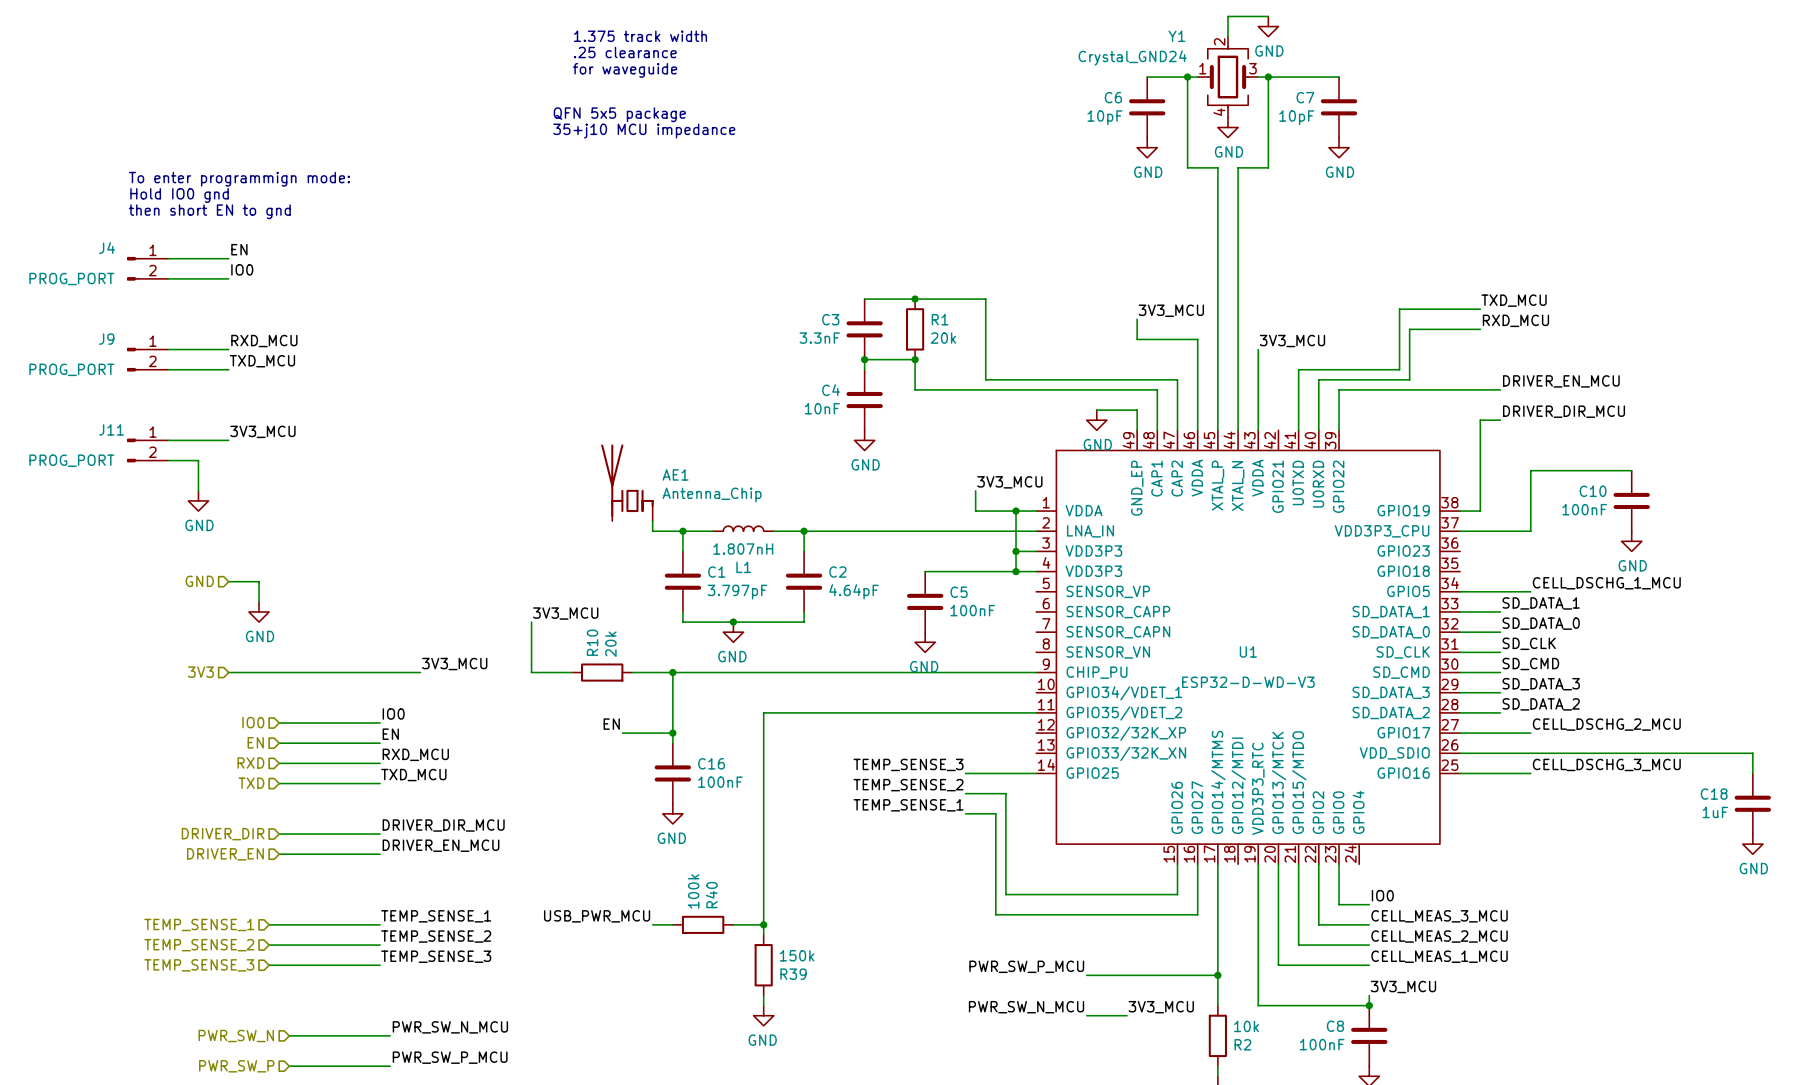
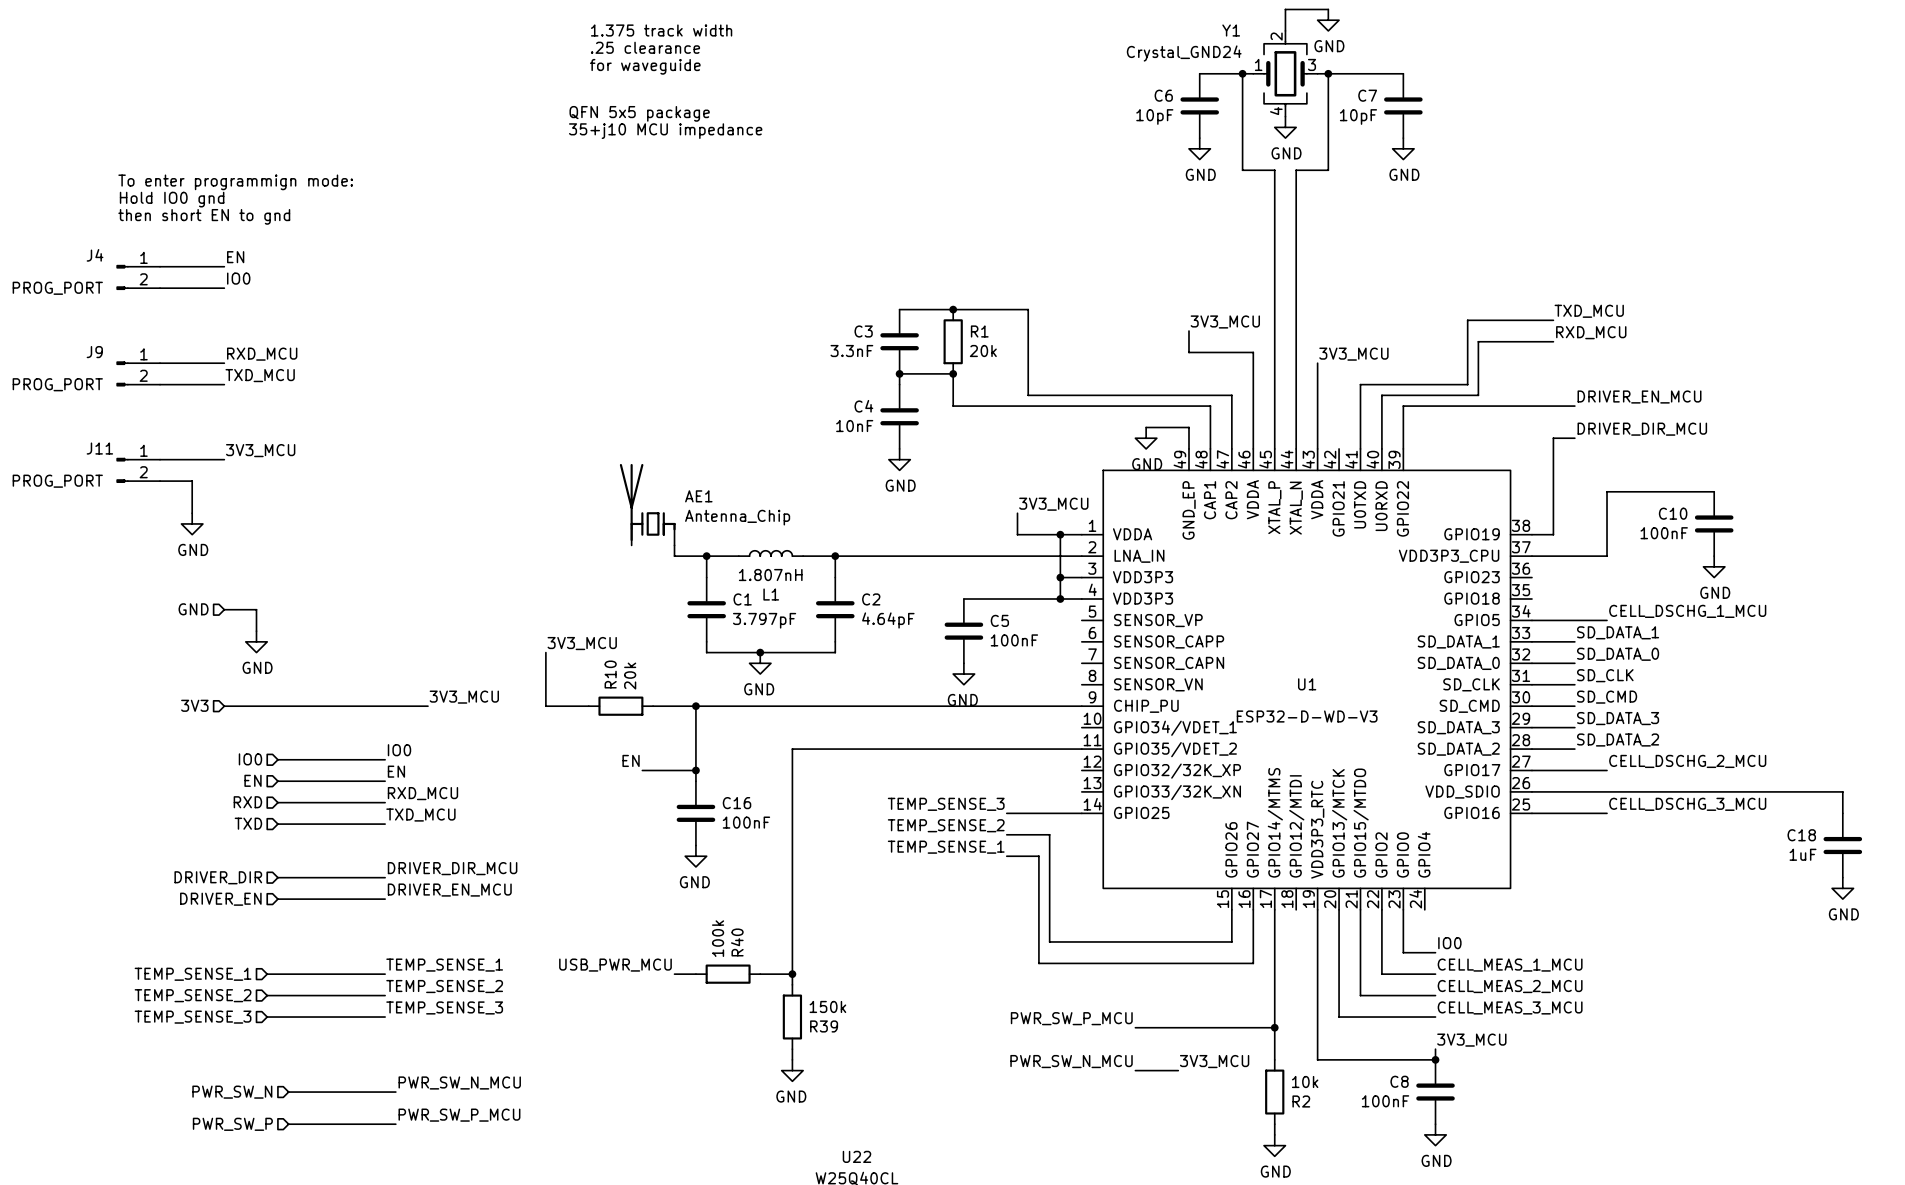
label: CELL_MEAS_3_MCU (1439, 916) -> CELL_MEAS_1_MCU (1510, 965)
label: CELL_MEAS_1_MCU (1439, 956) -> CELL_MEAS_3_MCU (1510, 1007)

